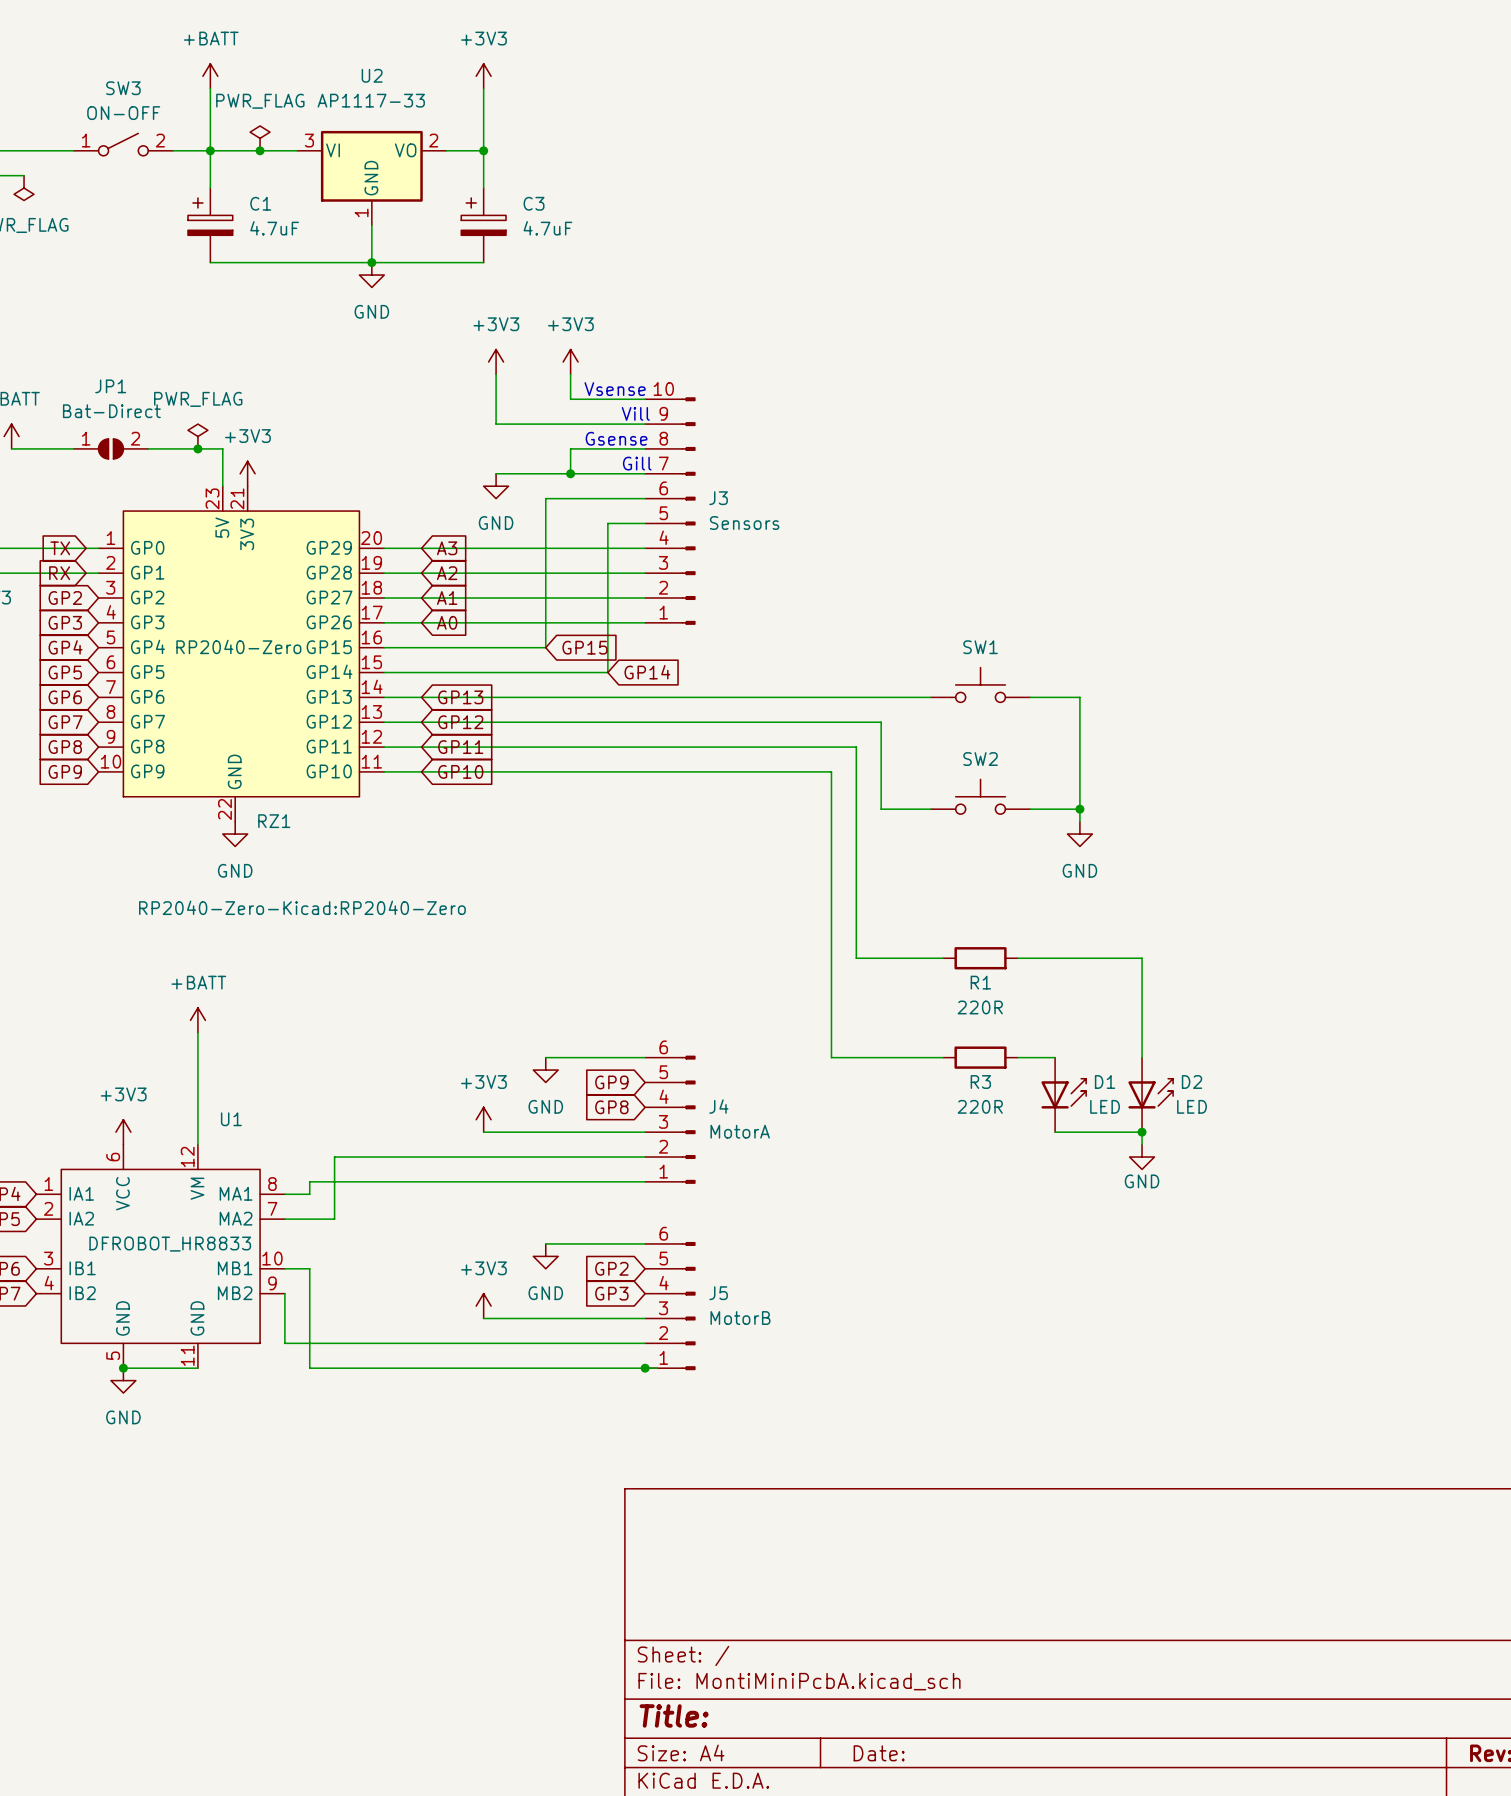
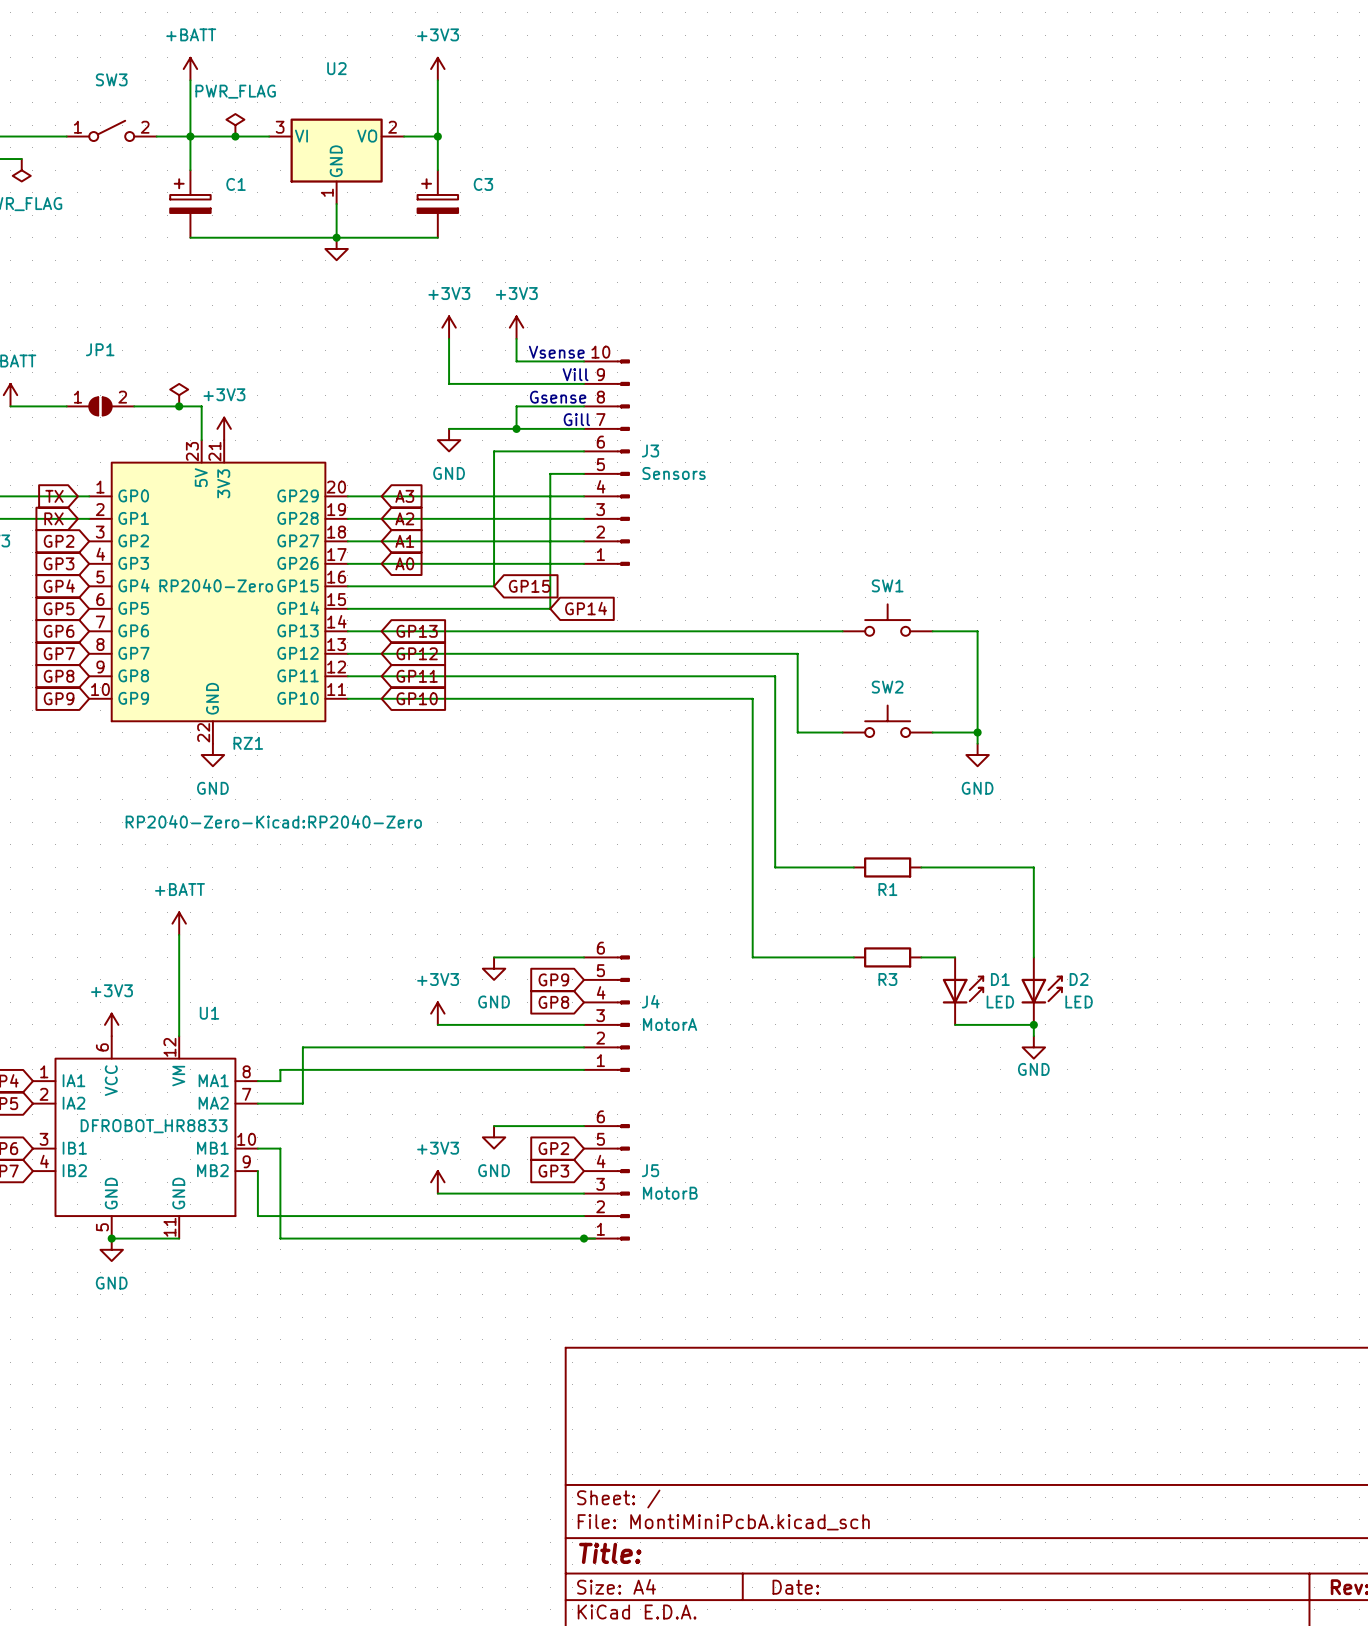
U2 value: AP1117-33 (371, 100) -> none
SW3 value: ON-OFF (123, 113) -> none
C1 value: 4.7uF (274, 228) -> none
C3 value: 4.7uF (547, 228) -> none
power symbol text: GND (371, 311) -> none
power symbol text: PWR_FLAG (198, 399) -> none
JP1 value: Bat-Direct (111, 411) -> none
R1 value: 220R (980, 1007) -> none
R3 value: 220R (980, 1106) -> none

